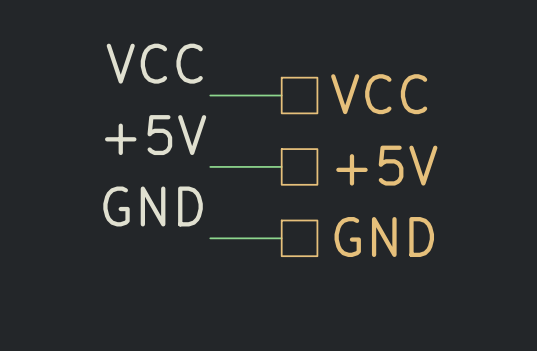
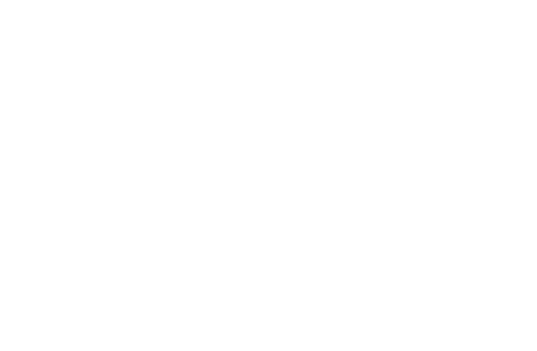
label: VCC (154, 63) -> none
hierarchical label: VCC (379, 94) -> none
wire: (210, 95) (281, 95) -> none
label: +5V (155, 135) -> none
hierarchical label: +5V (386, 165) -> none
wire: (210, 166) (281, 166) -> none
label: GND (153, 206) -> none
hierarchical label: GND (384, 237) -> none
wire: (210, 238) (281, 238) -> none

